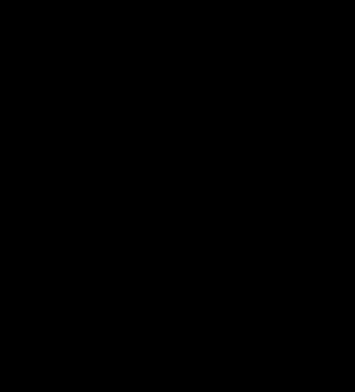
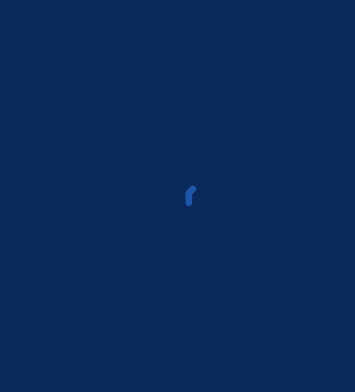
track: none -> (192, 188) (188, 192) (188, 202)

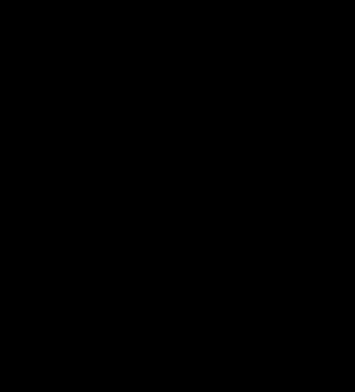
track: (192, 188) (188, 192) (188, 202) -> none

